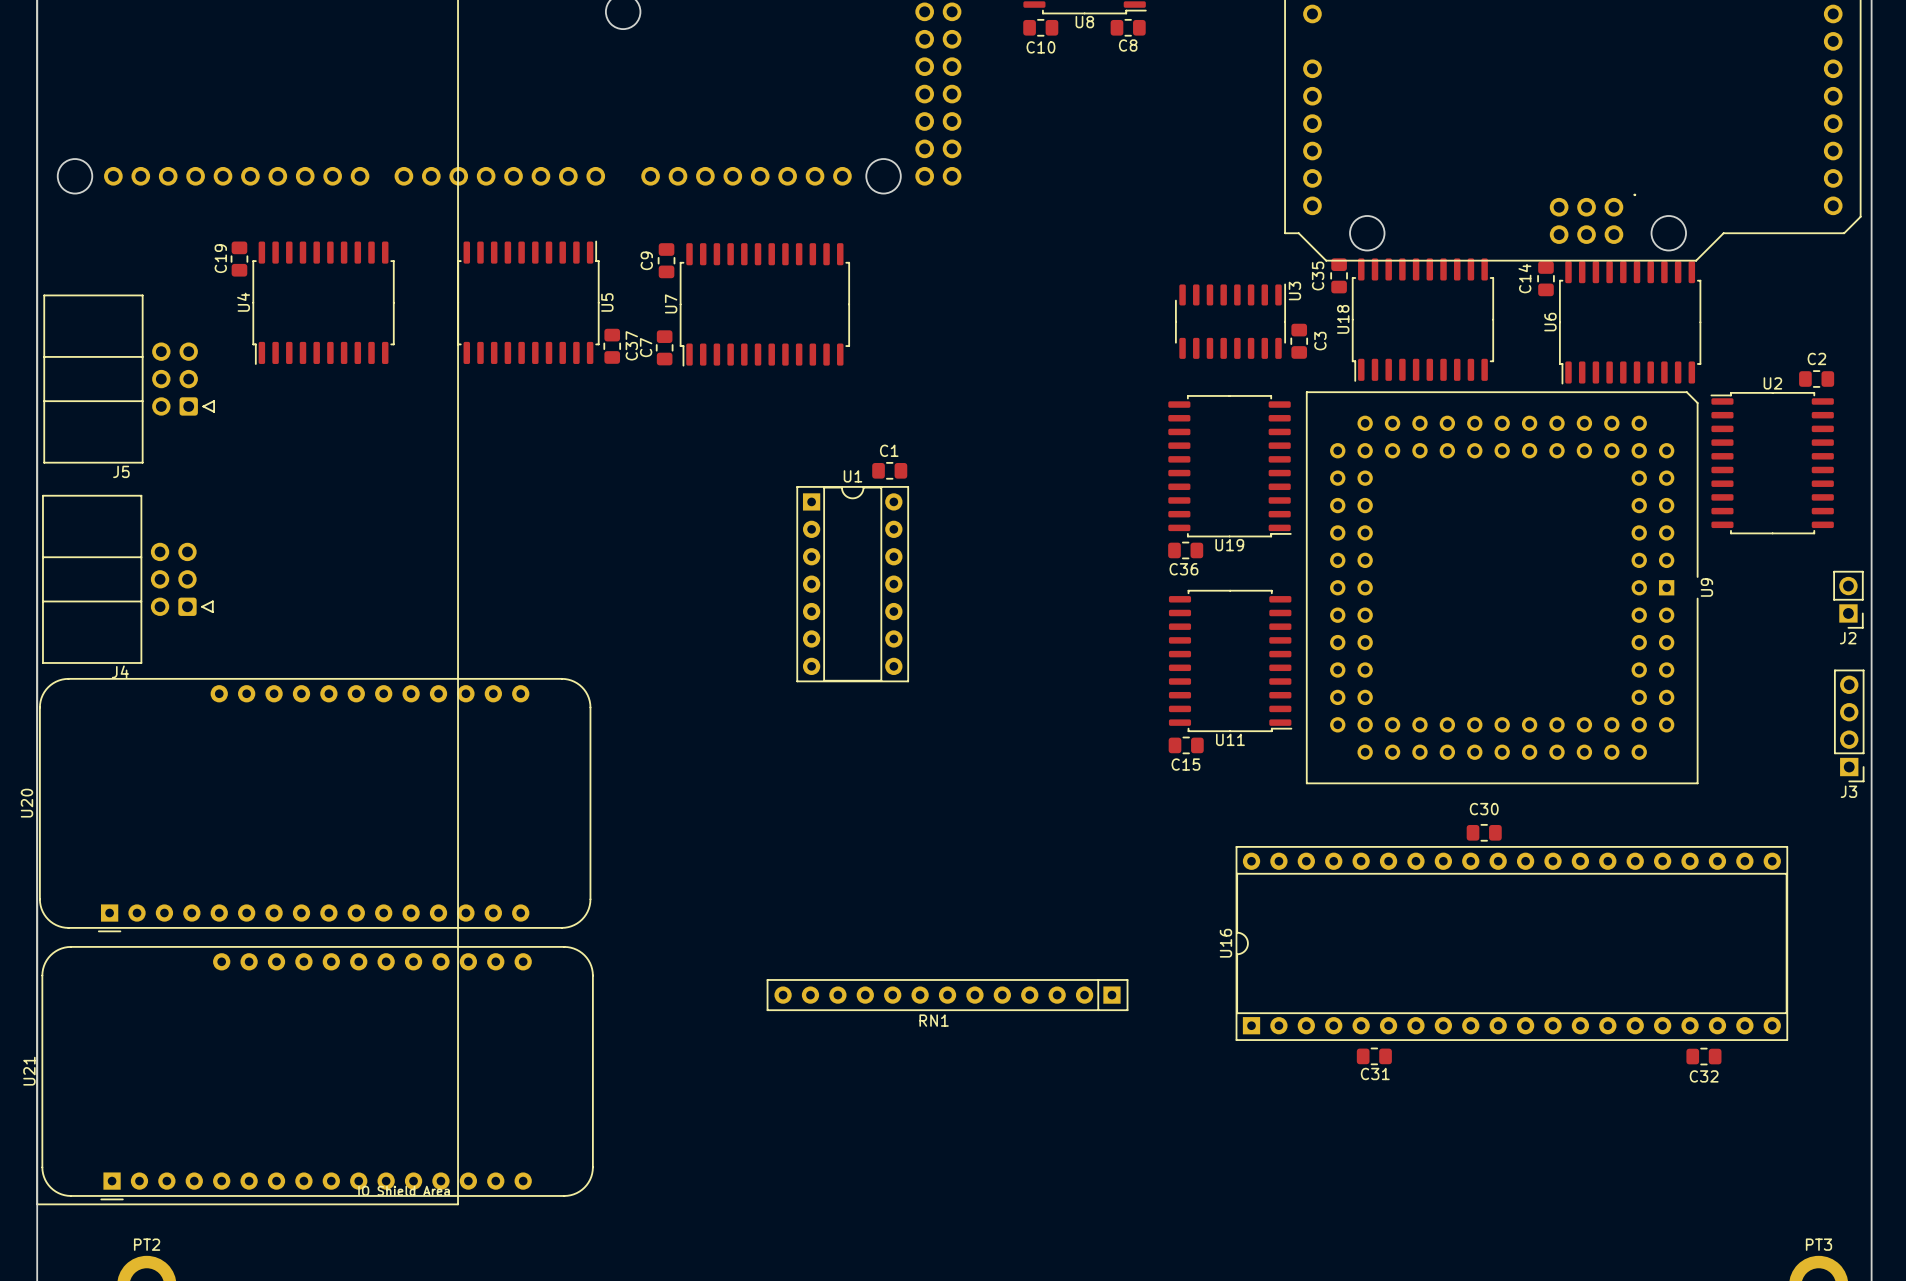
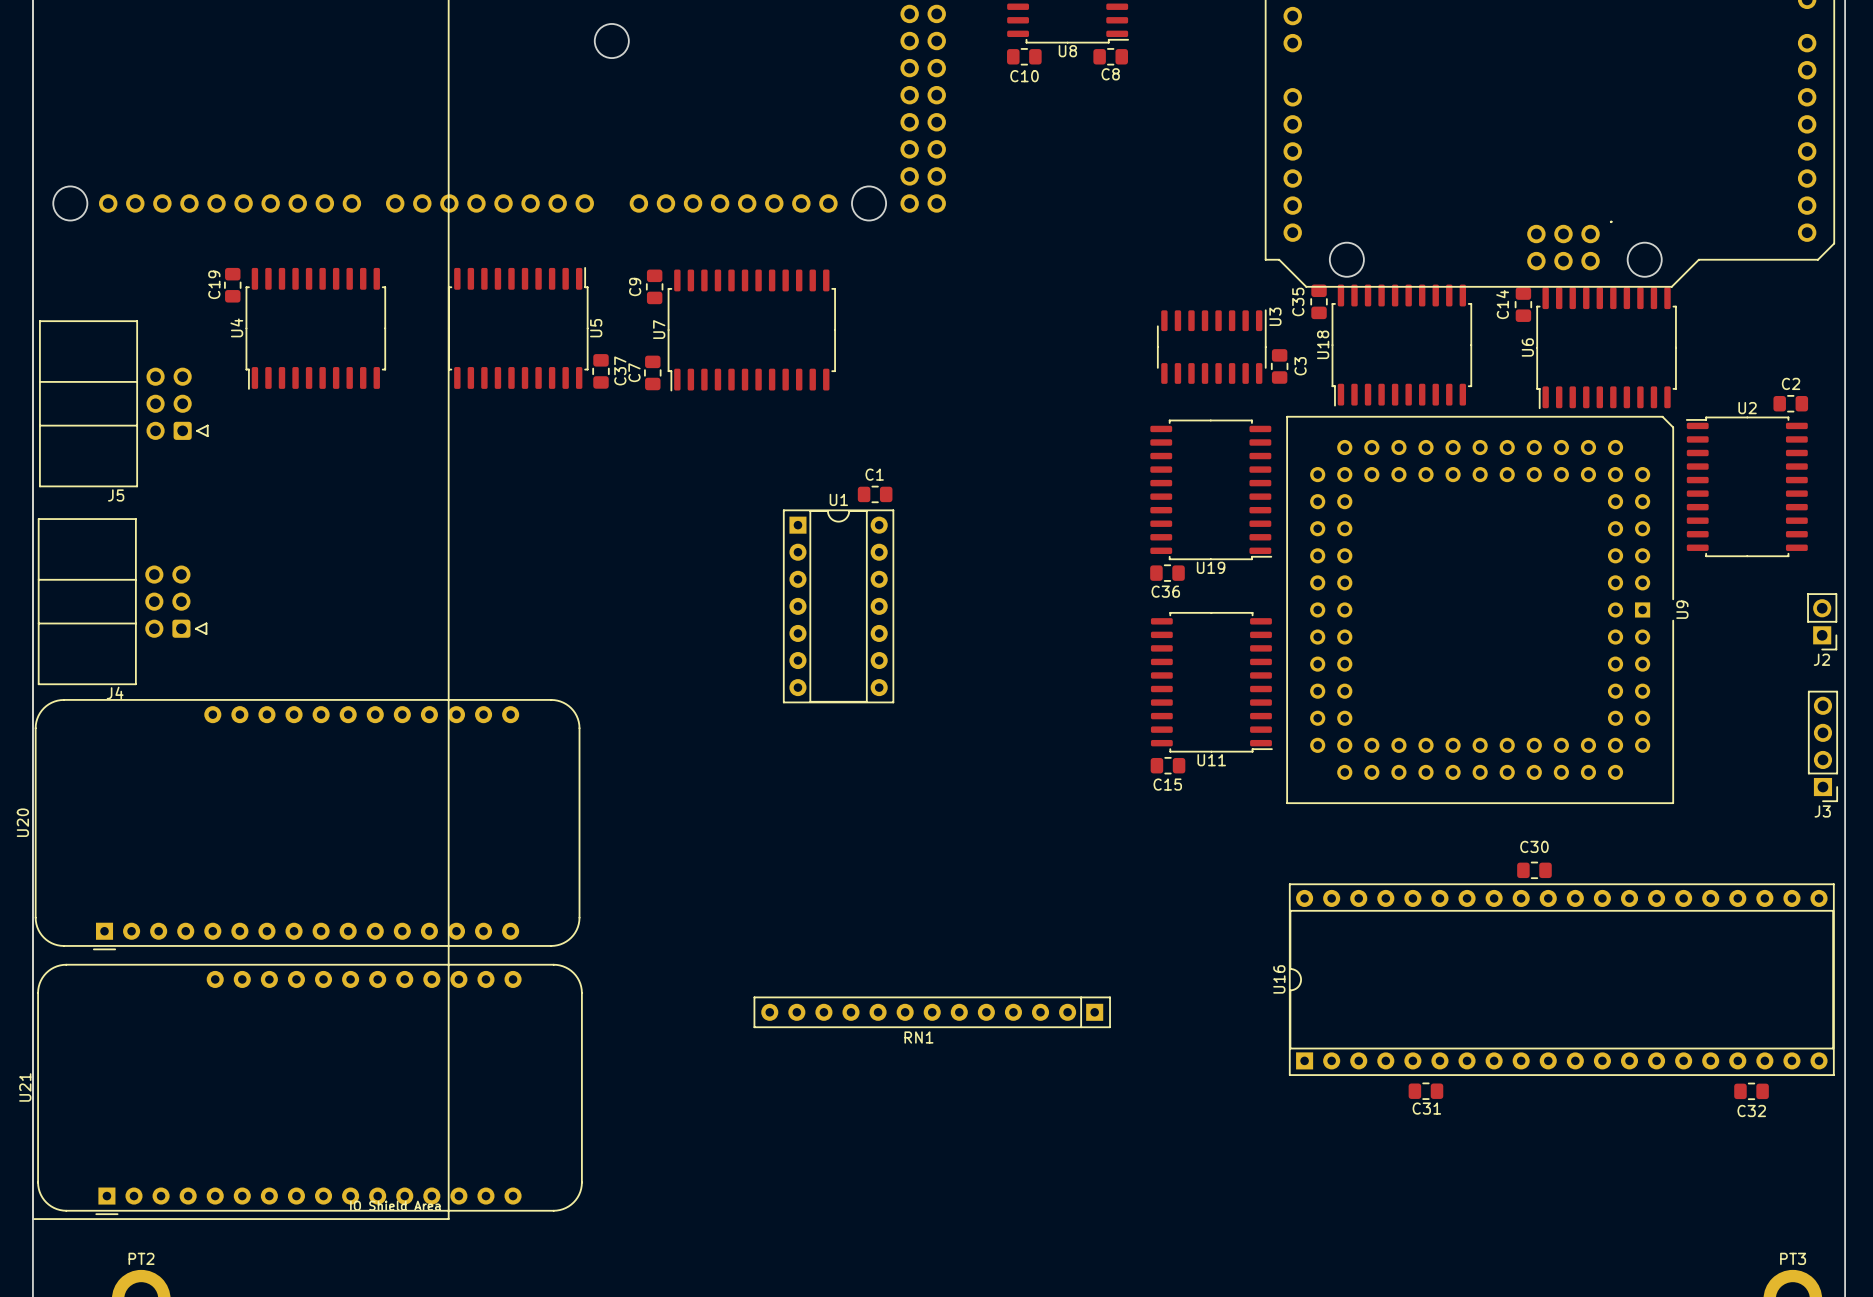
C30 position: (1484, 832) -> (1534, 870)
U16 position: (1511, 943) -> (1561, 979)
C31 position: (1374, 1056) -> (1425, 1091)
C32 position: (1703, 1056) -> (1751, 1091)

